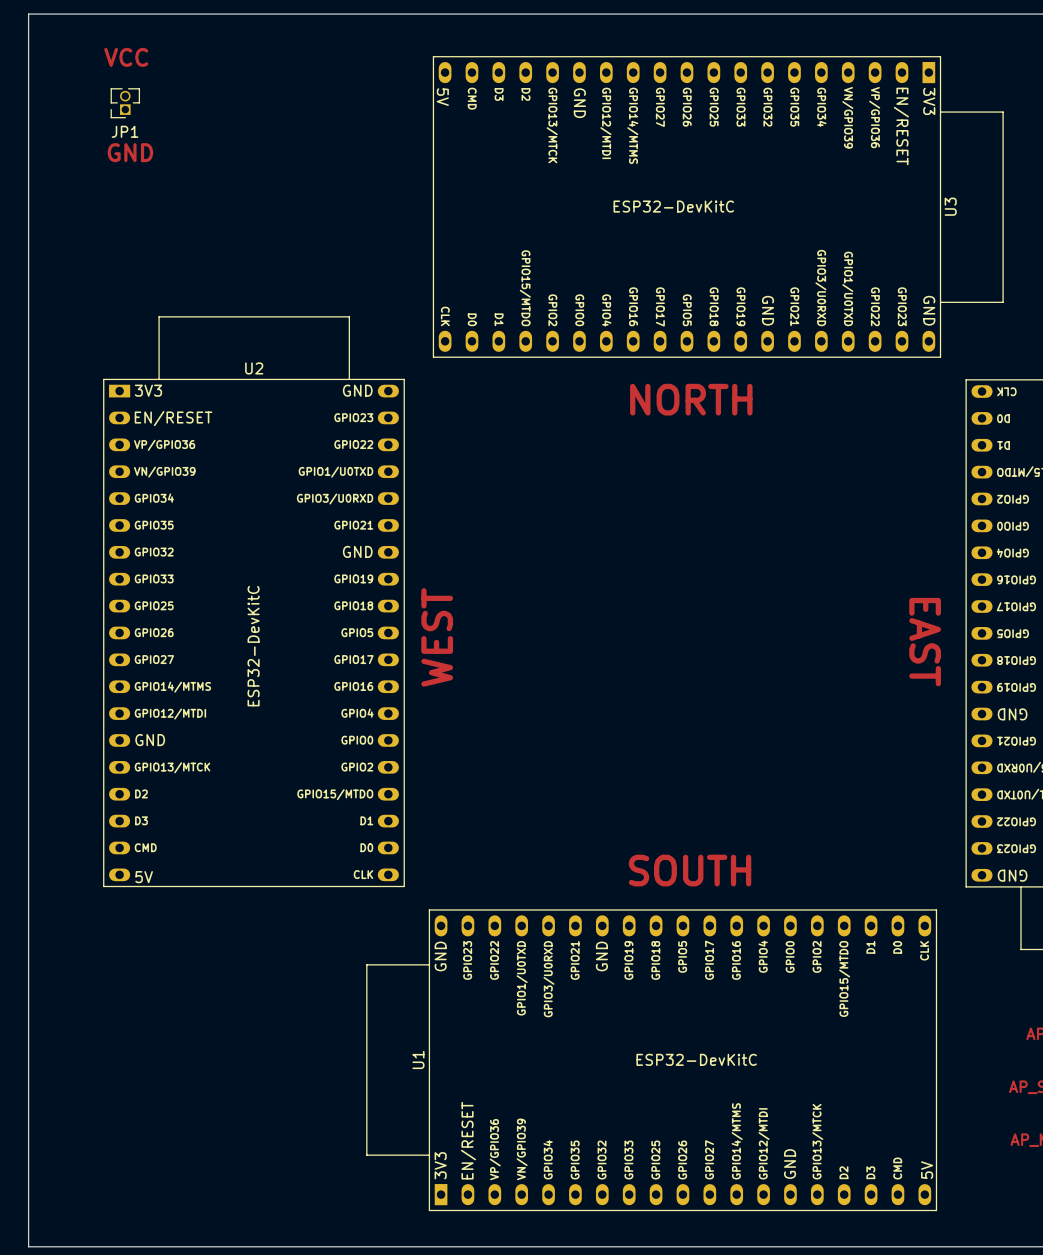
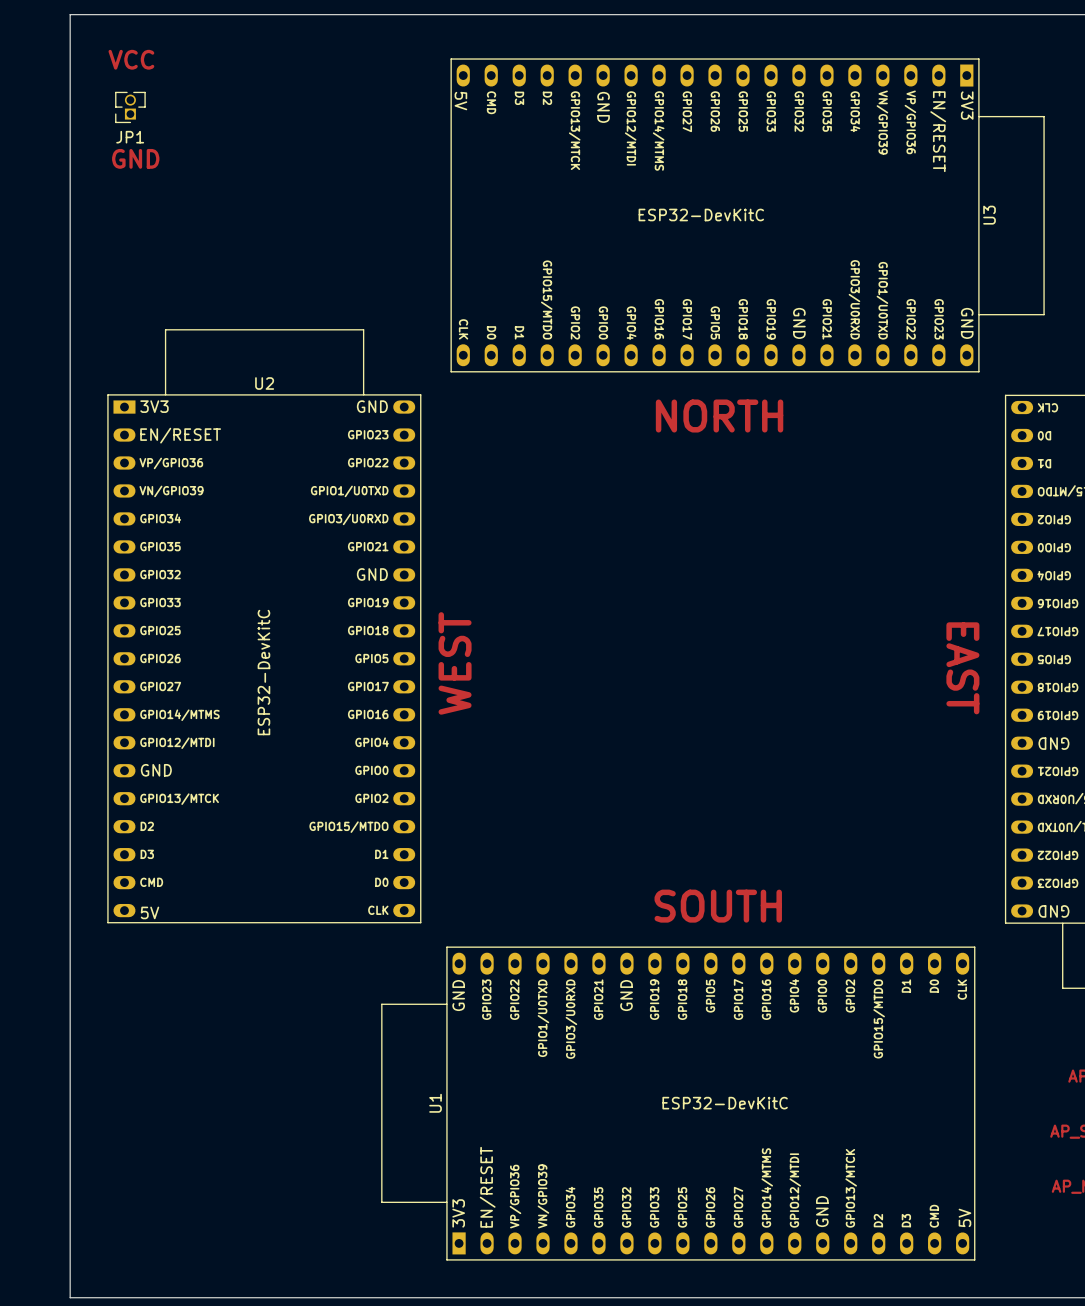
board edge: (67, 14) (28, 14) (28, 1246) (67, 1246) -> (70, 14) (70, 1297)

